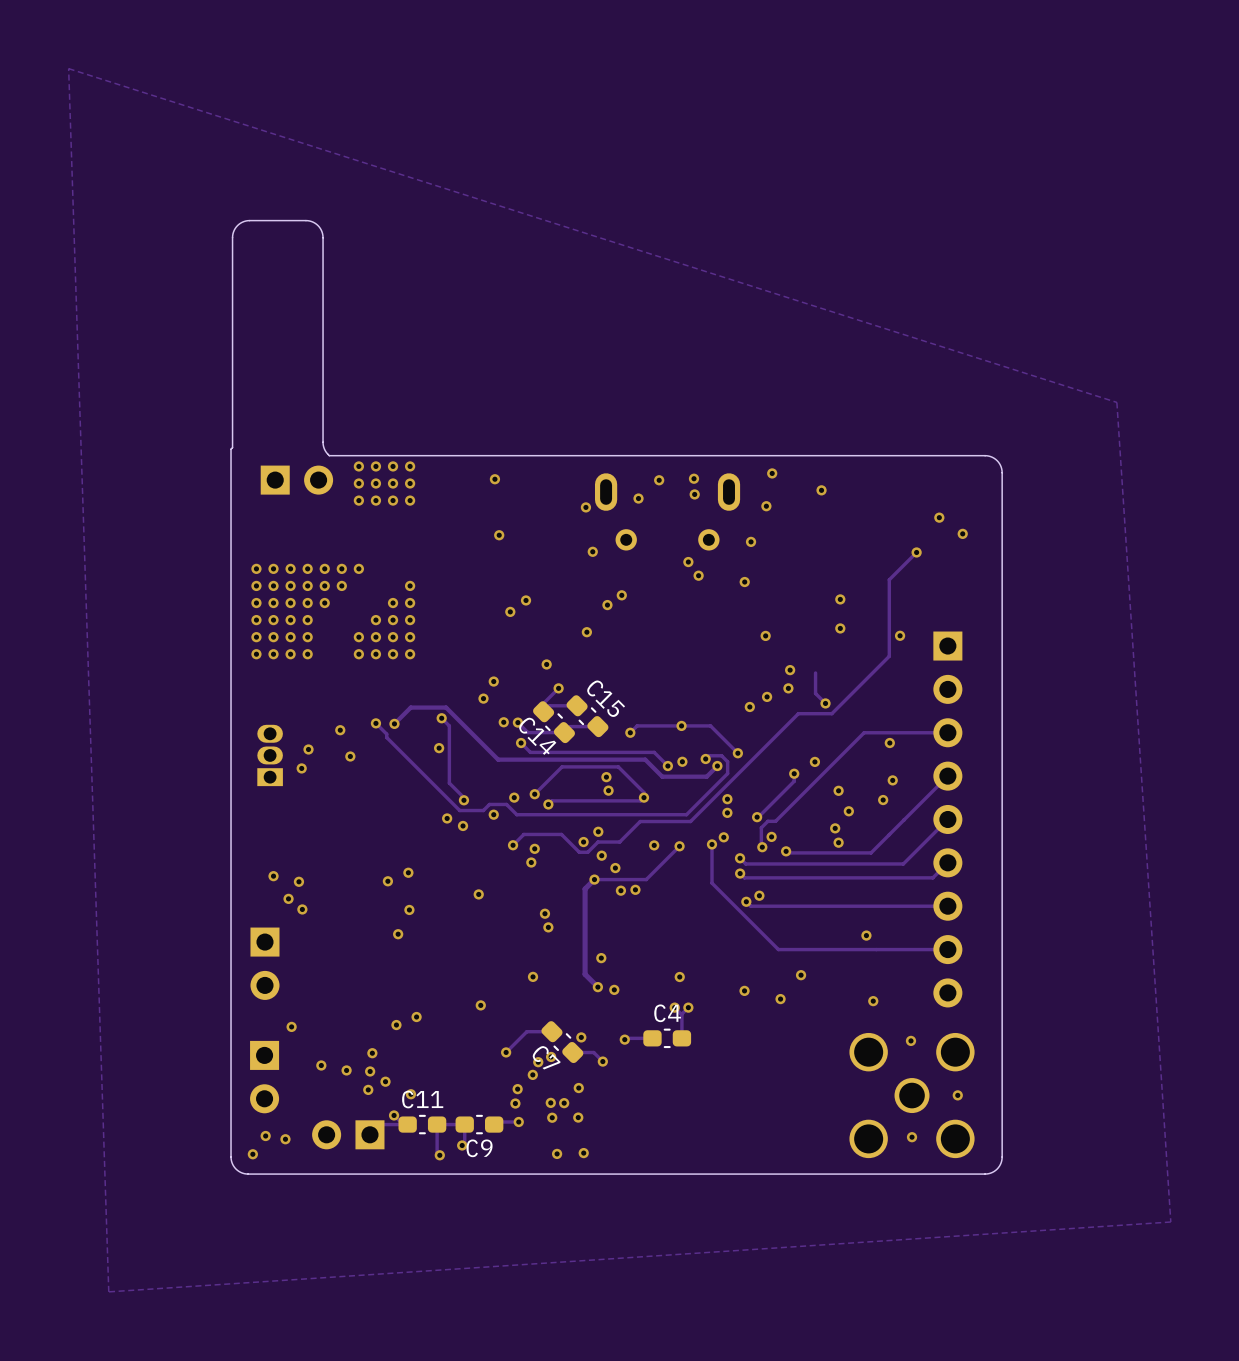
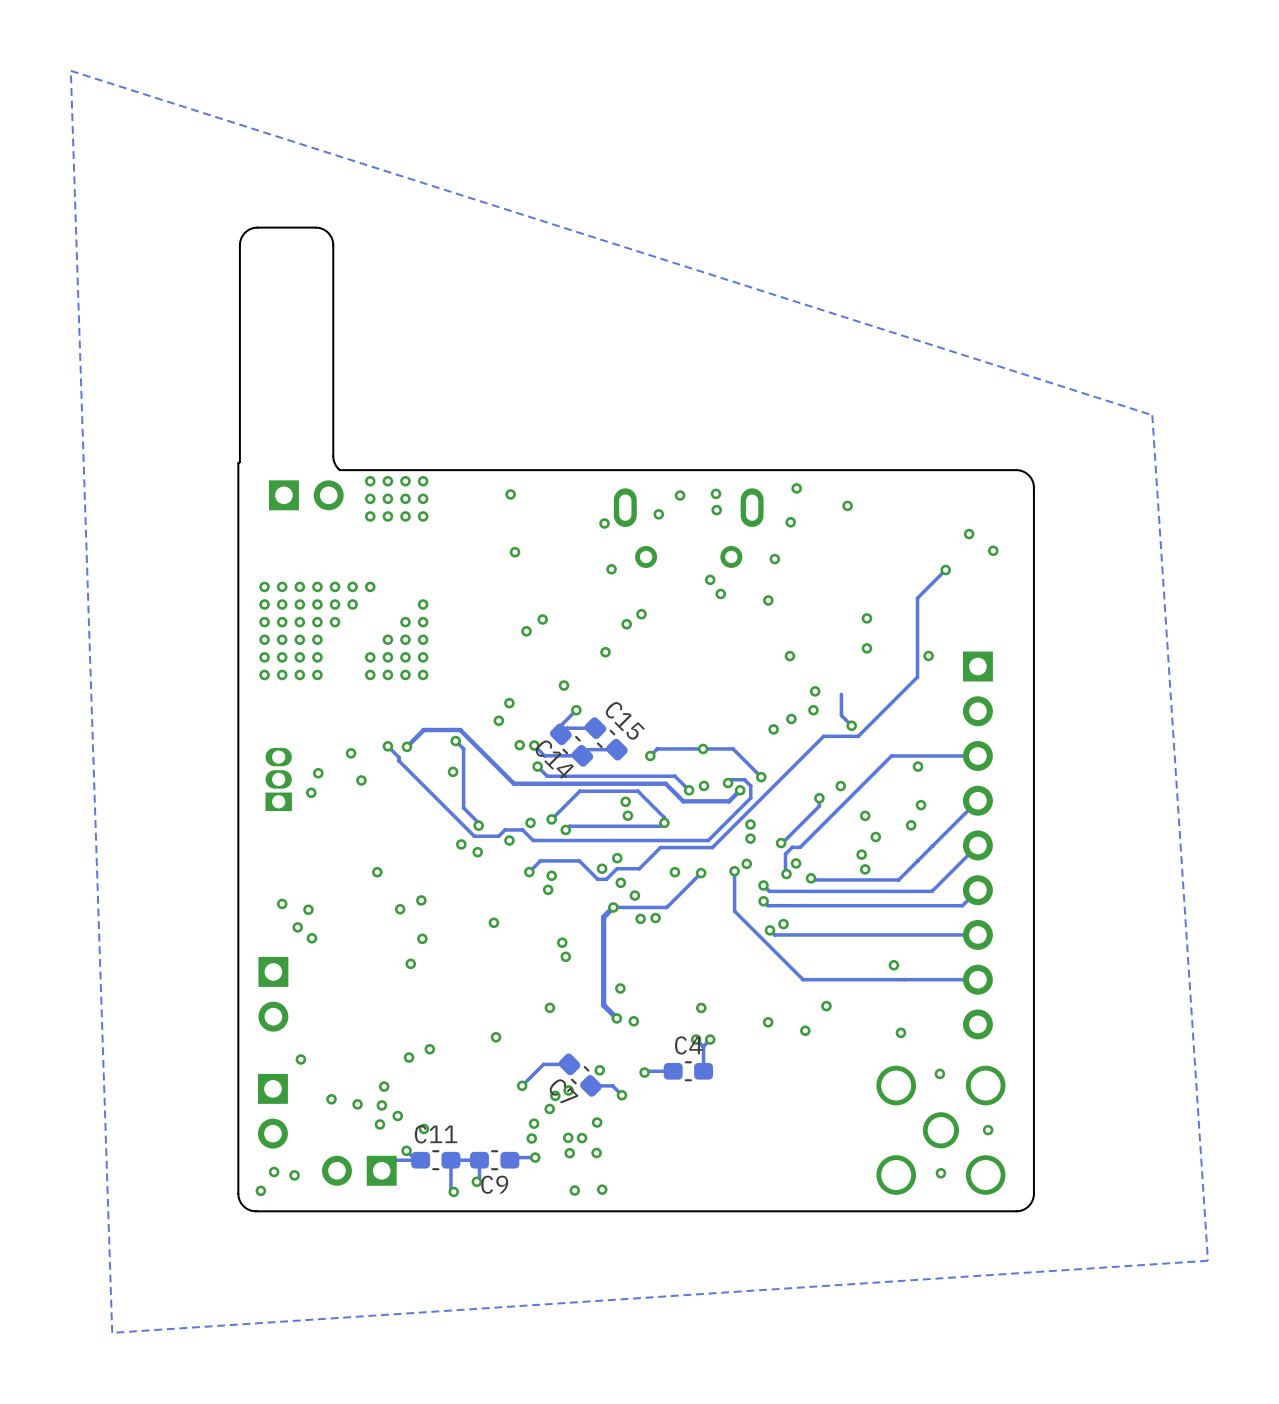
via: none -> (377, 872)

